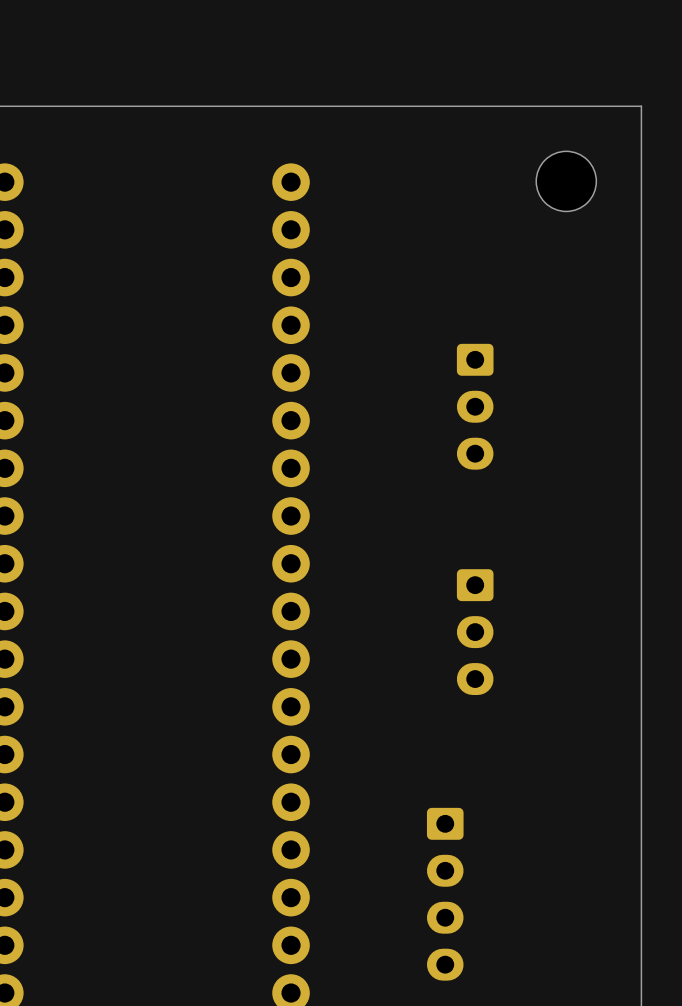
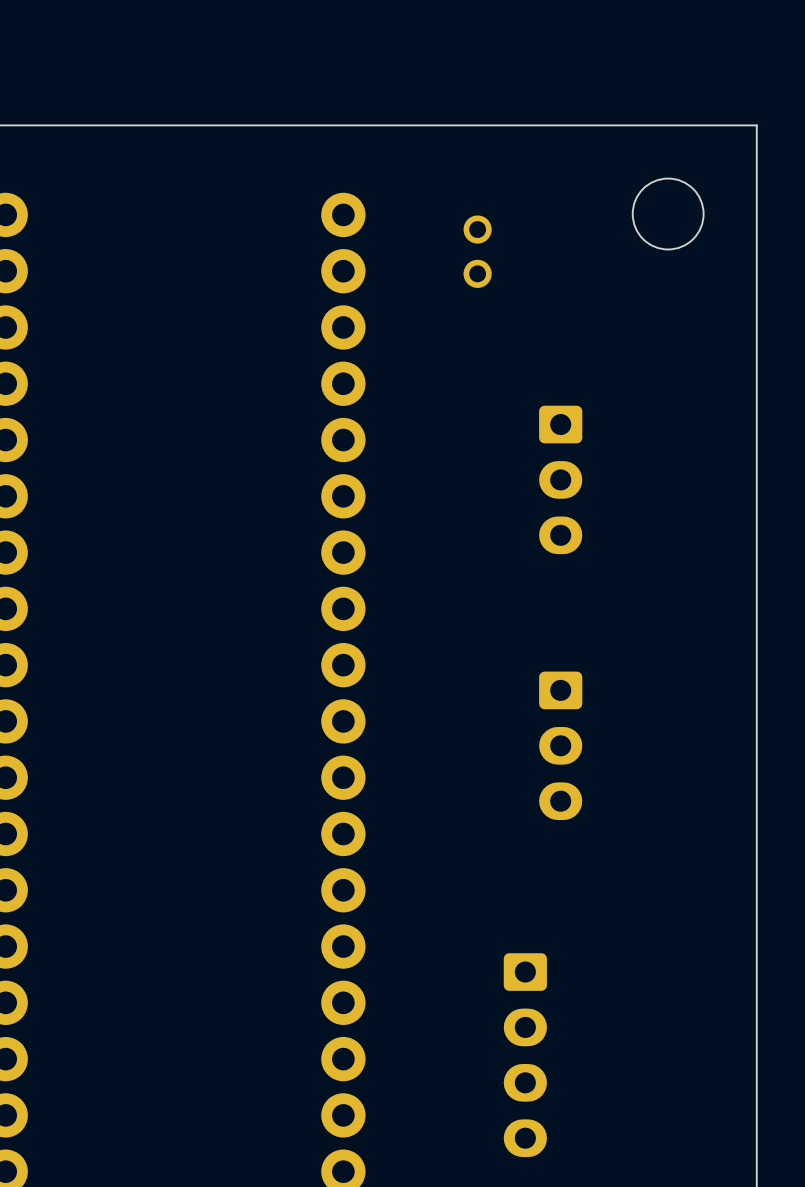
part: none -> (477, 251)

